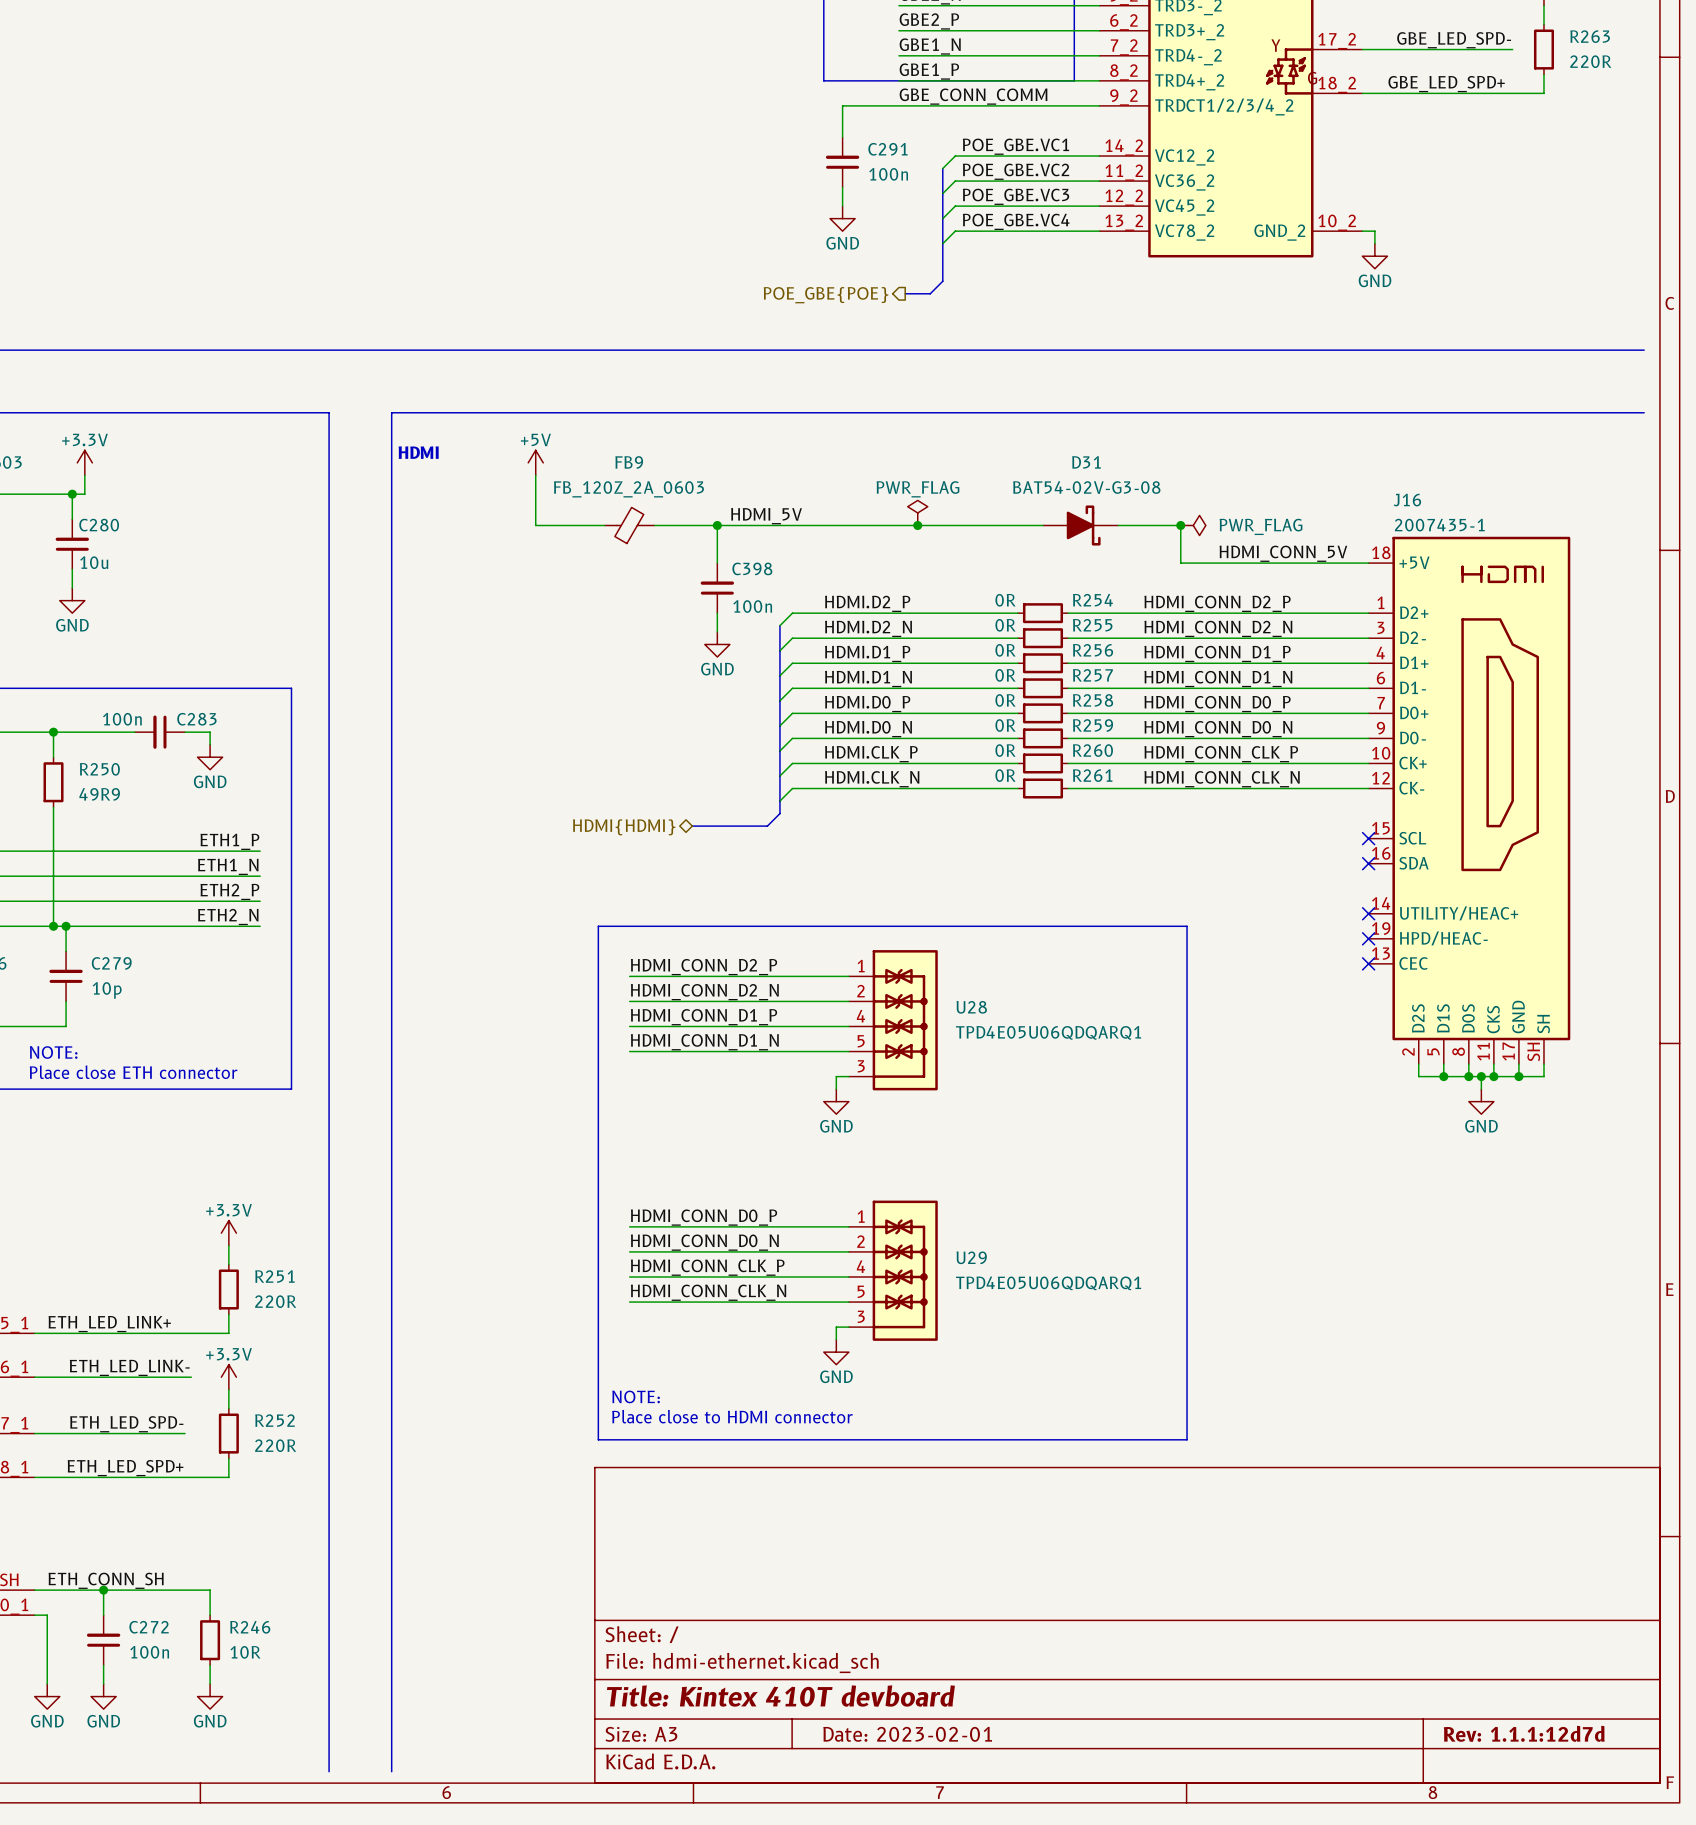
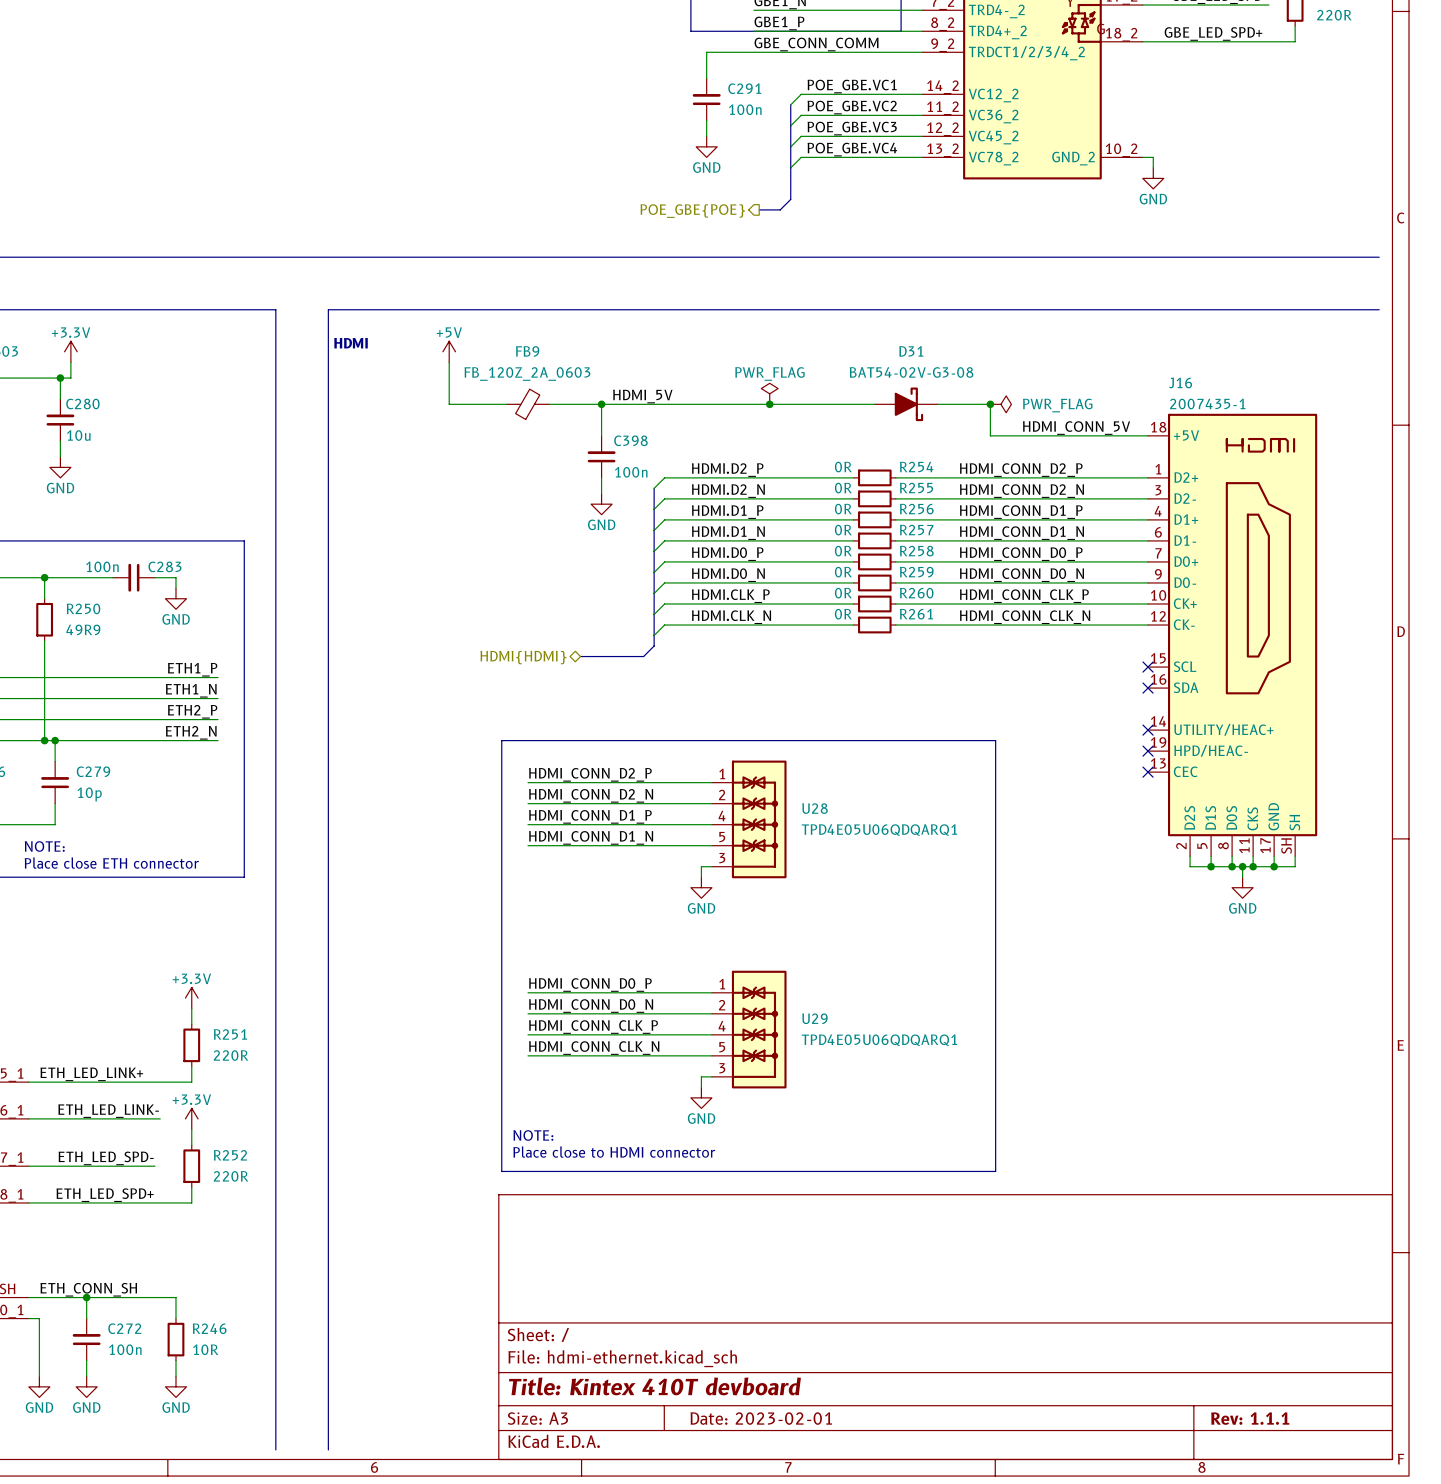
title block: Rev: 1.1.1:12d7d (1524, 1733) -> Rev: 1.1.1 (1250, 1418)

